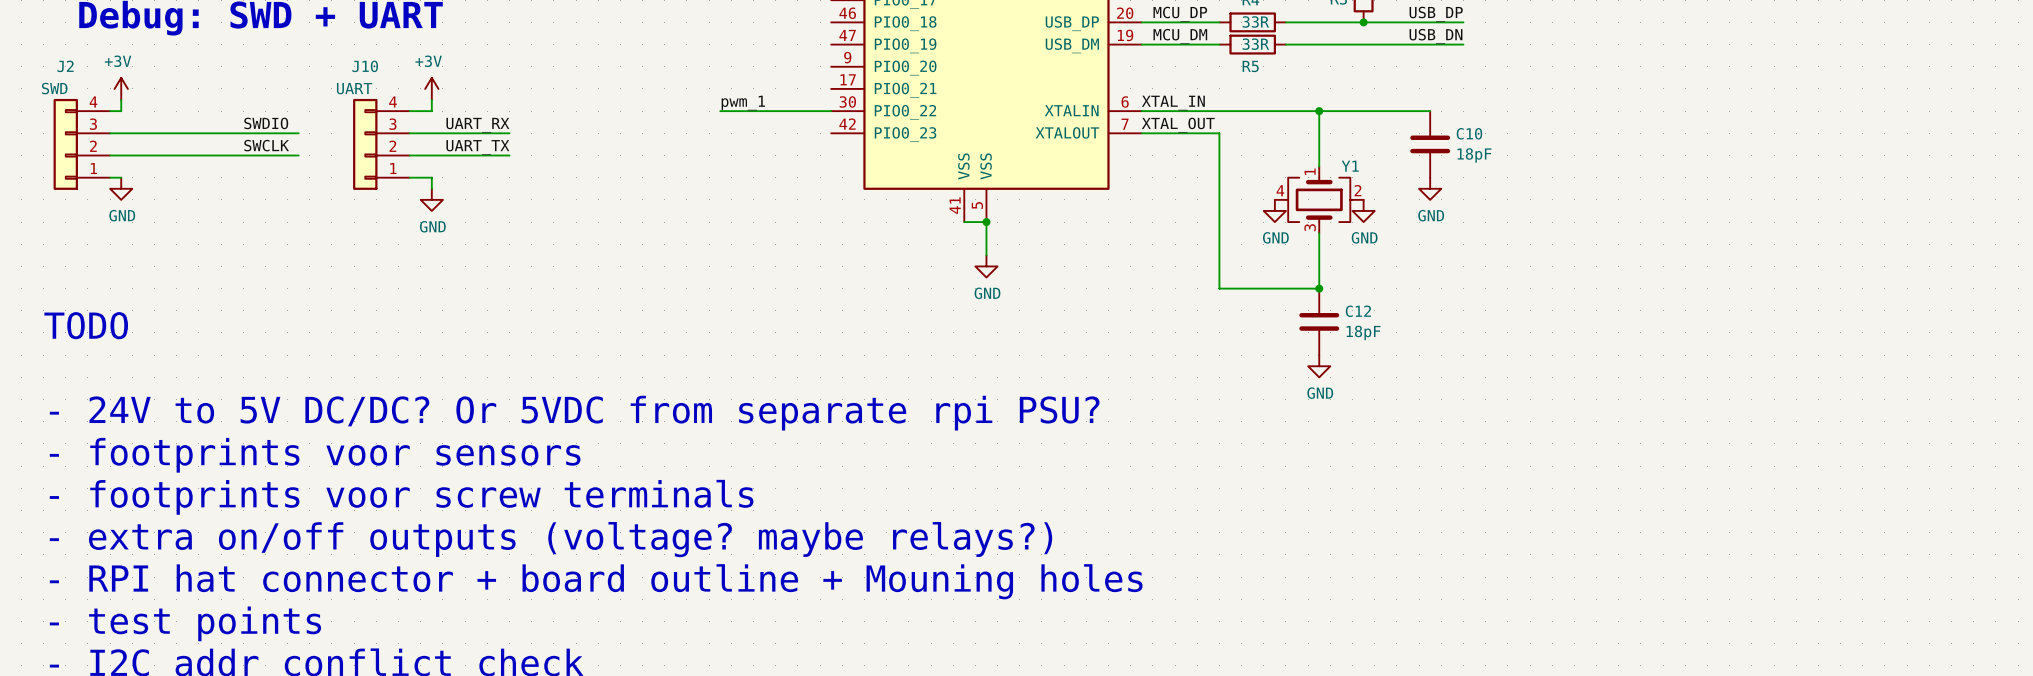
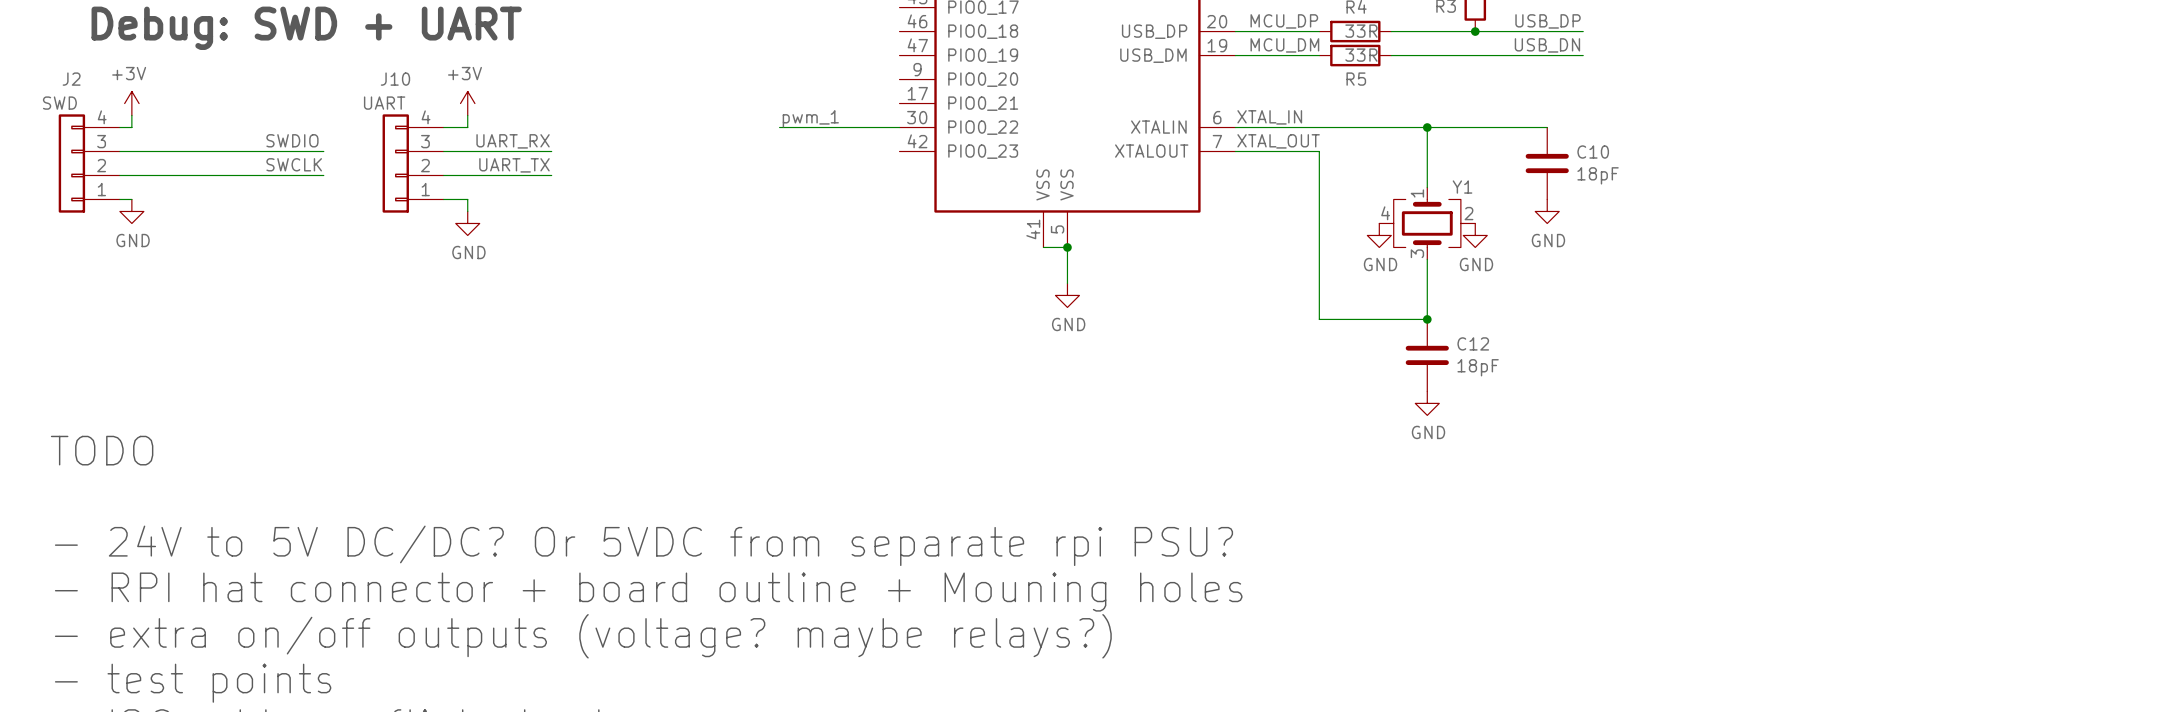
text: TODO (86, 325) -> none
text: - 24V to 5V DC/DC? Or 5VDC from separate rpi PSU? (574, 413) -> TODO (102, 450)
text: - footprints voor sensors (315, 455) -> none
text: - footprints voor screw terminals (401, 497) -> - 24V to 5V DC/DC? Or 5VDC from separate rpi PSU? (643, 545)
text: - extra on/off outputs (voltage? maybe relays?) (551, 539) -> - RPI hat connector + board outline + Mouning holes (648, 592)
text: - RPI hat connector + board outline + Mouning holes (596, 581) -> - extra on/off outputs (voltage? maybe relays?) (583, 636)

